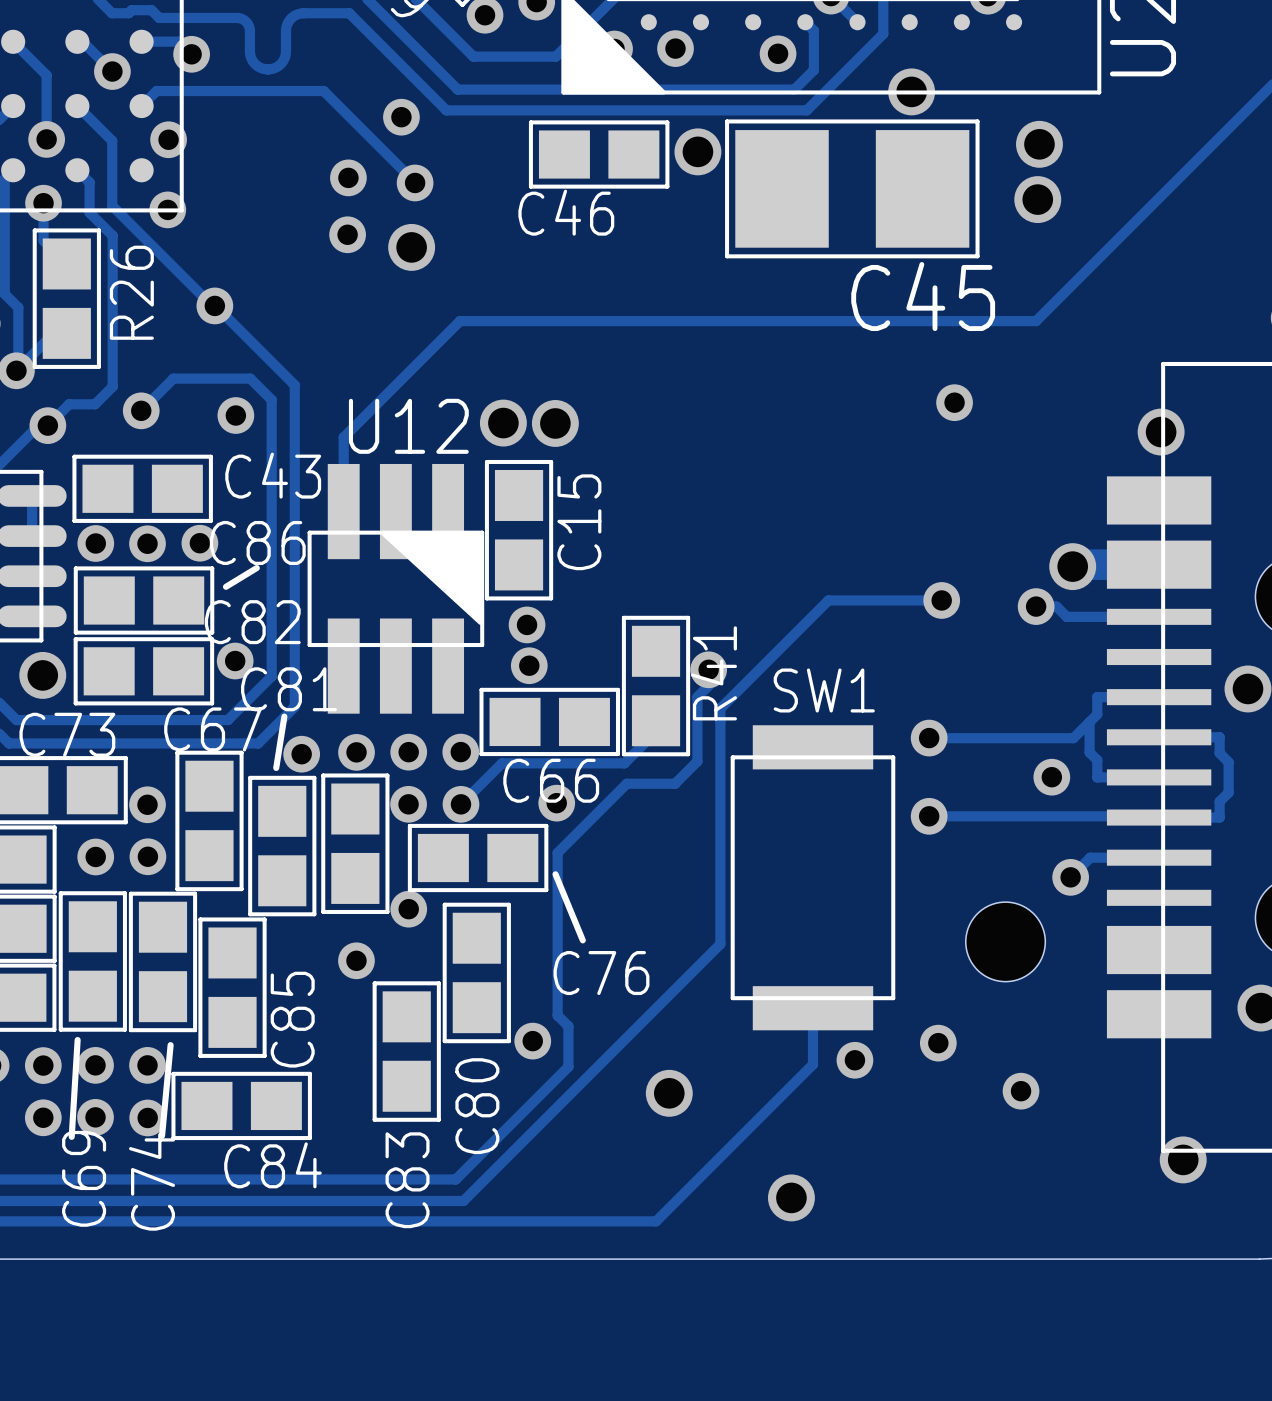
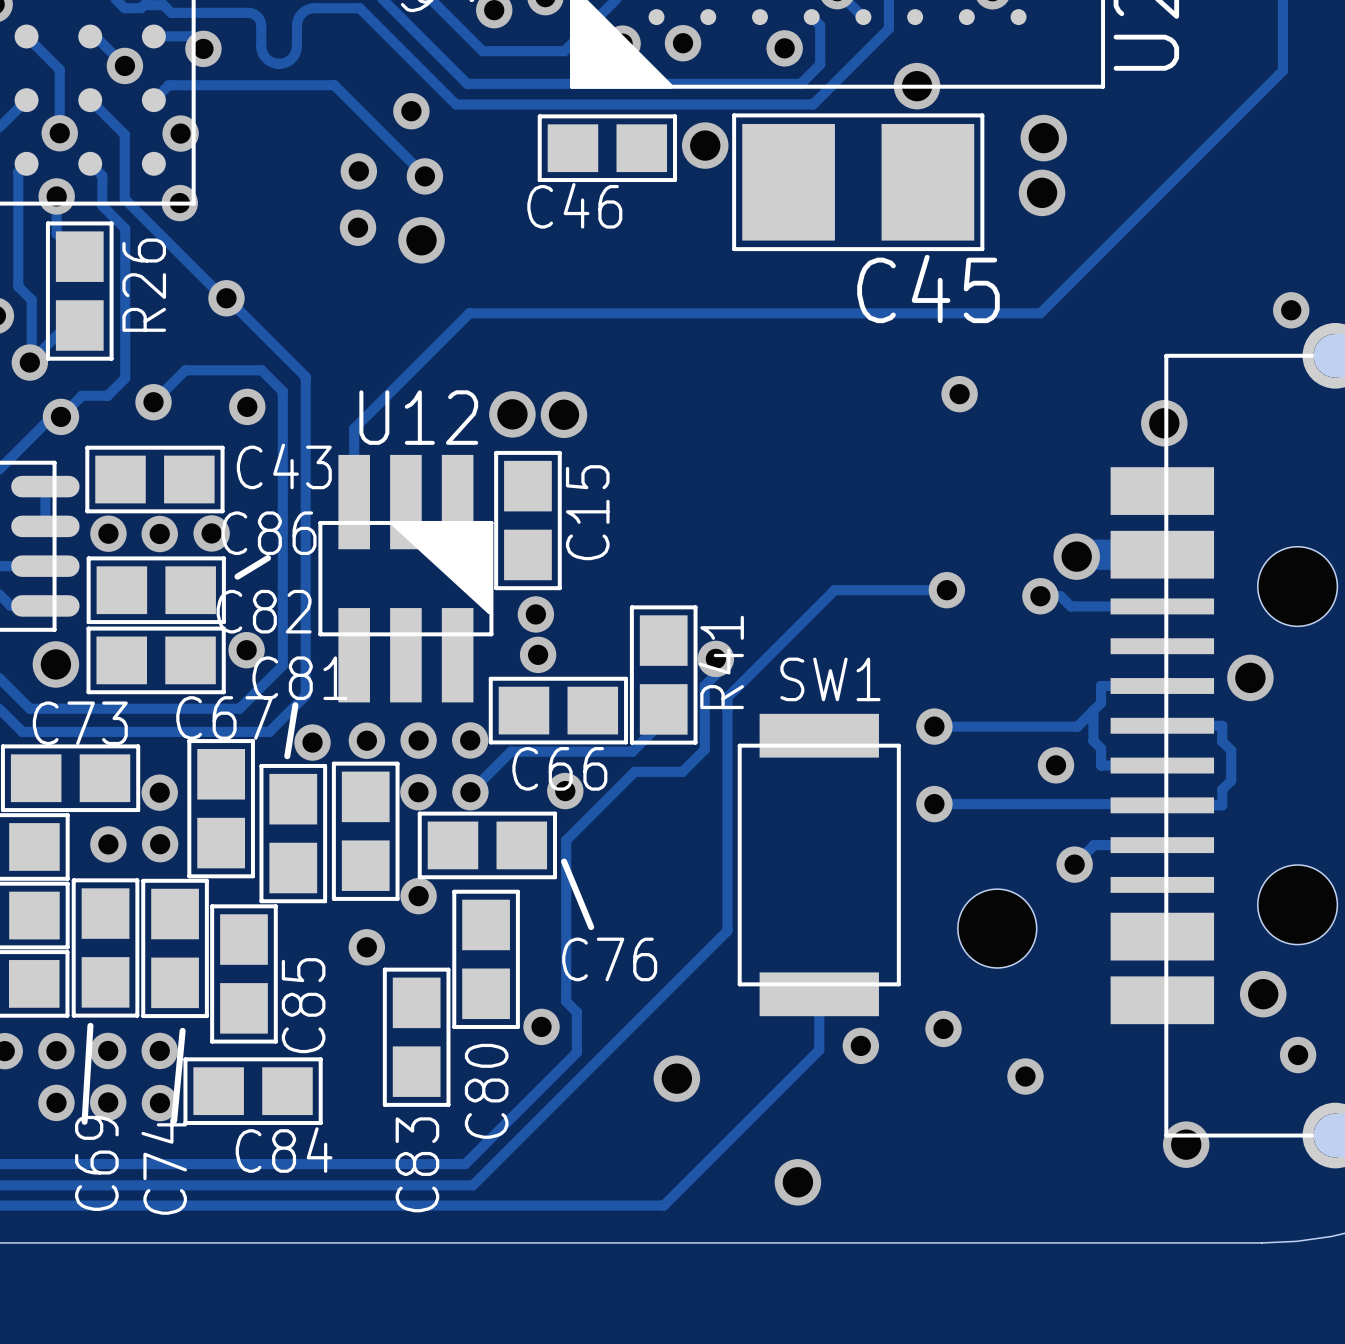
part position: (1005, 941) -> (997, 928)

